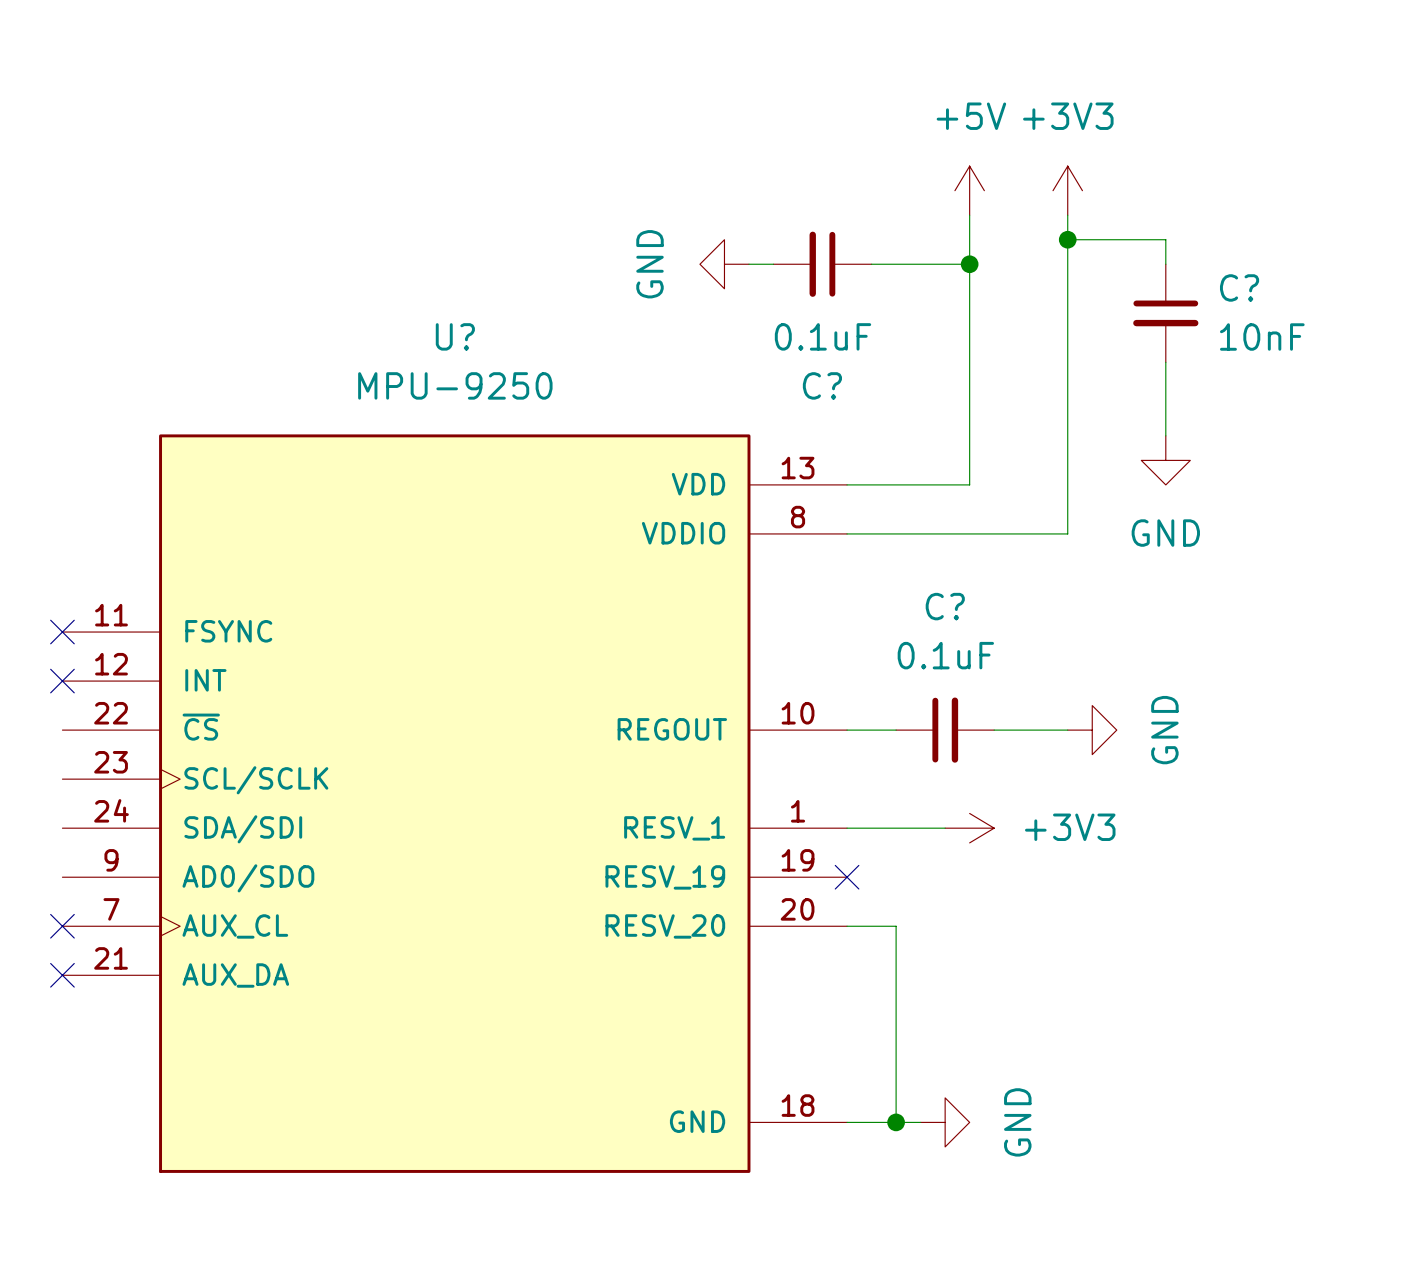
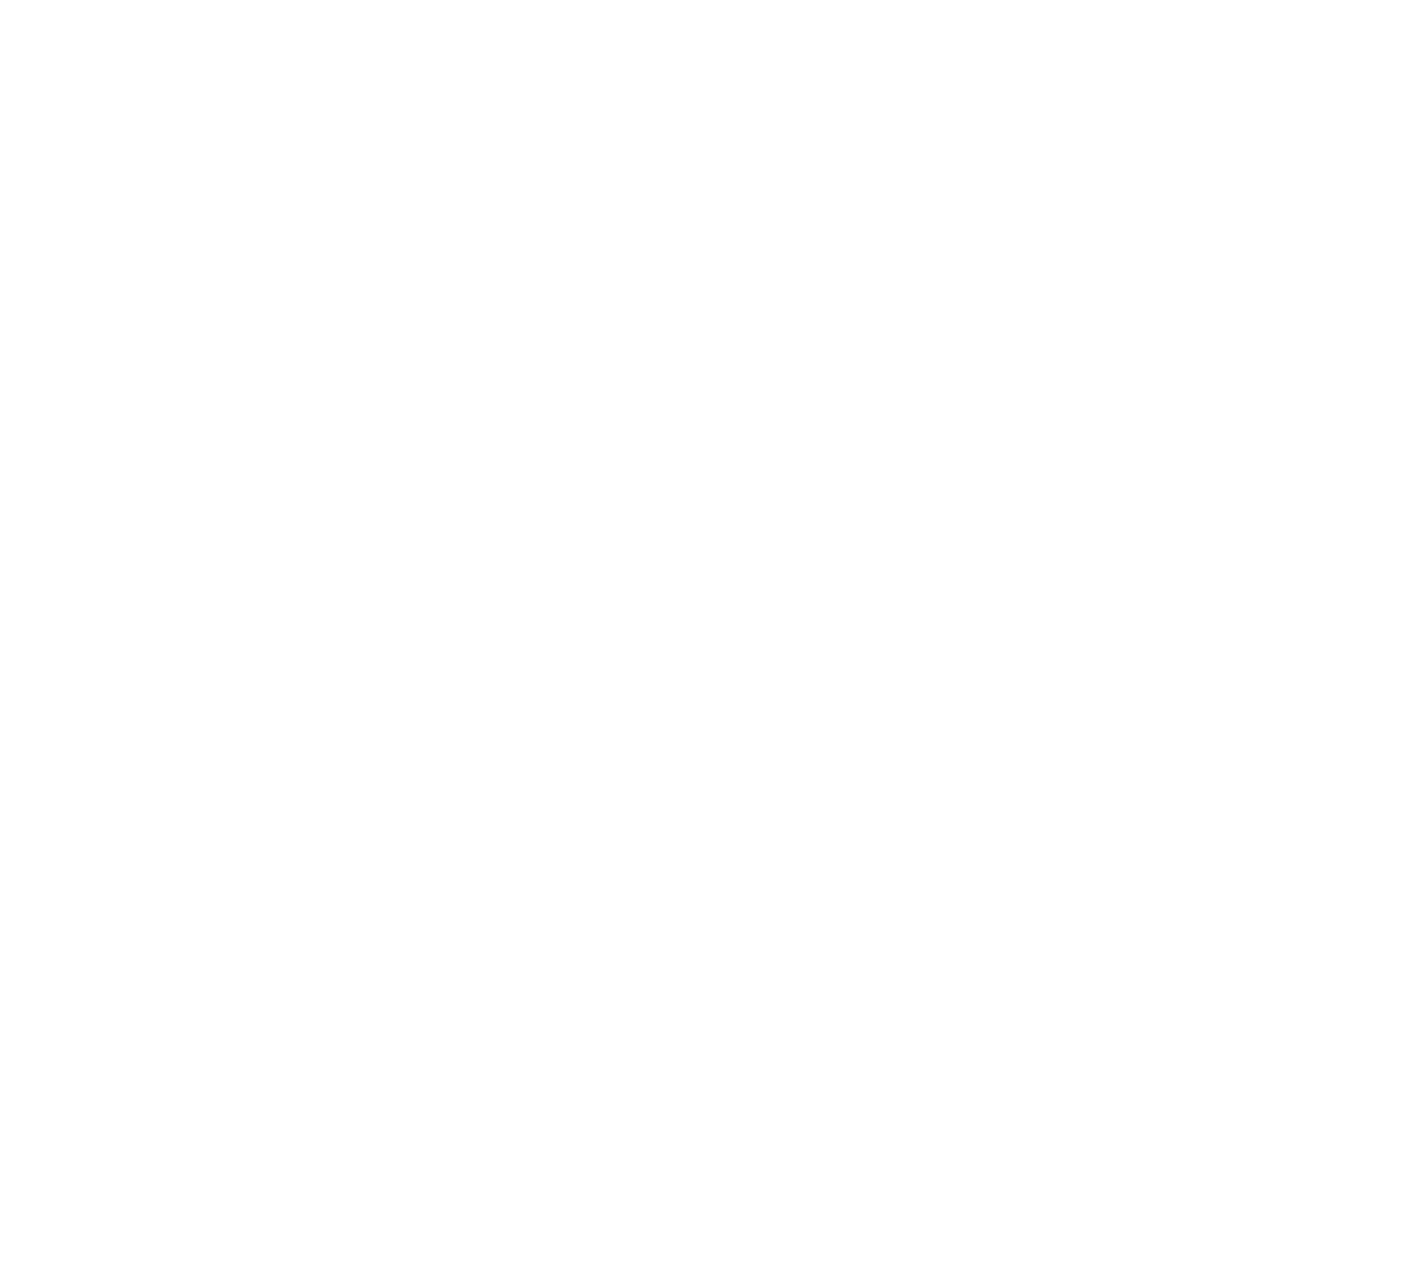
power symbol: +5V (969, 190) -> none
power symbol: +3V3 (1067, 190) -> none
wire: (969, 215) (969, 484) (847, 484) -> none
wire: (1067, 215) (1067, 533) (847, 533) -> none
wire: (1067, 239) (1165, 239) (1165, 264) -> none
junction: (1067, 239) -> none
power symbol: GND (724, 264) -> none
wire: (748, 264) (773, 264) -> none
C?: 0.1uF (822, 264) -> none
wire: (871, 264) (969, 264) -> none
junction: (969, 264) -> none
C?: 10nF (1165, 313) -> none
wire: (1165, 362) (1165, 435) -> none
power symbol: GND (1165, 460) -> none
no-connect mark: (62, 632) -> none
no-connect mark: (62, 681) -> none
wire: (847, 730) (896, 730) -> none
C?: 0.1uF (945, 730) -> none
wire: (994, 730) (1067, 730) -> none
power symbol: GND (1092, 730) -> none
U?: MPU-9250 (454, 803) -> none
wire: (847, 828) (945, 828) -> none
power symbol: +3V3 (969, 828) -> none
no-connect mark: (847, 877) -> none
no-connect mark: (62, 926) -> none
wire: (847, 926) (896, 926) (896, 1122) -> none
no-connect mark: (62, 975) -> none
wire: (847, 1122) (920, 1122) -> none
junction: (896, 1122) -> none
power symbol: GND (945, 1122) -> none

